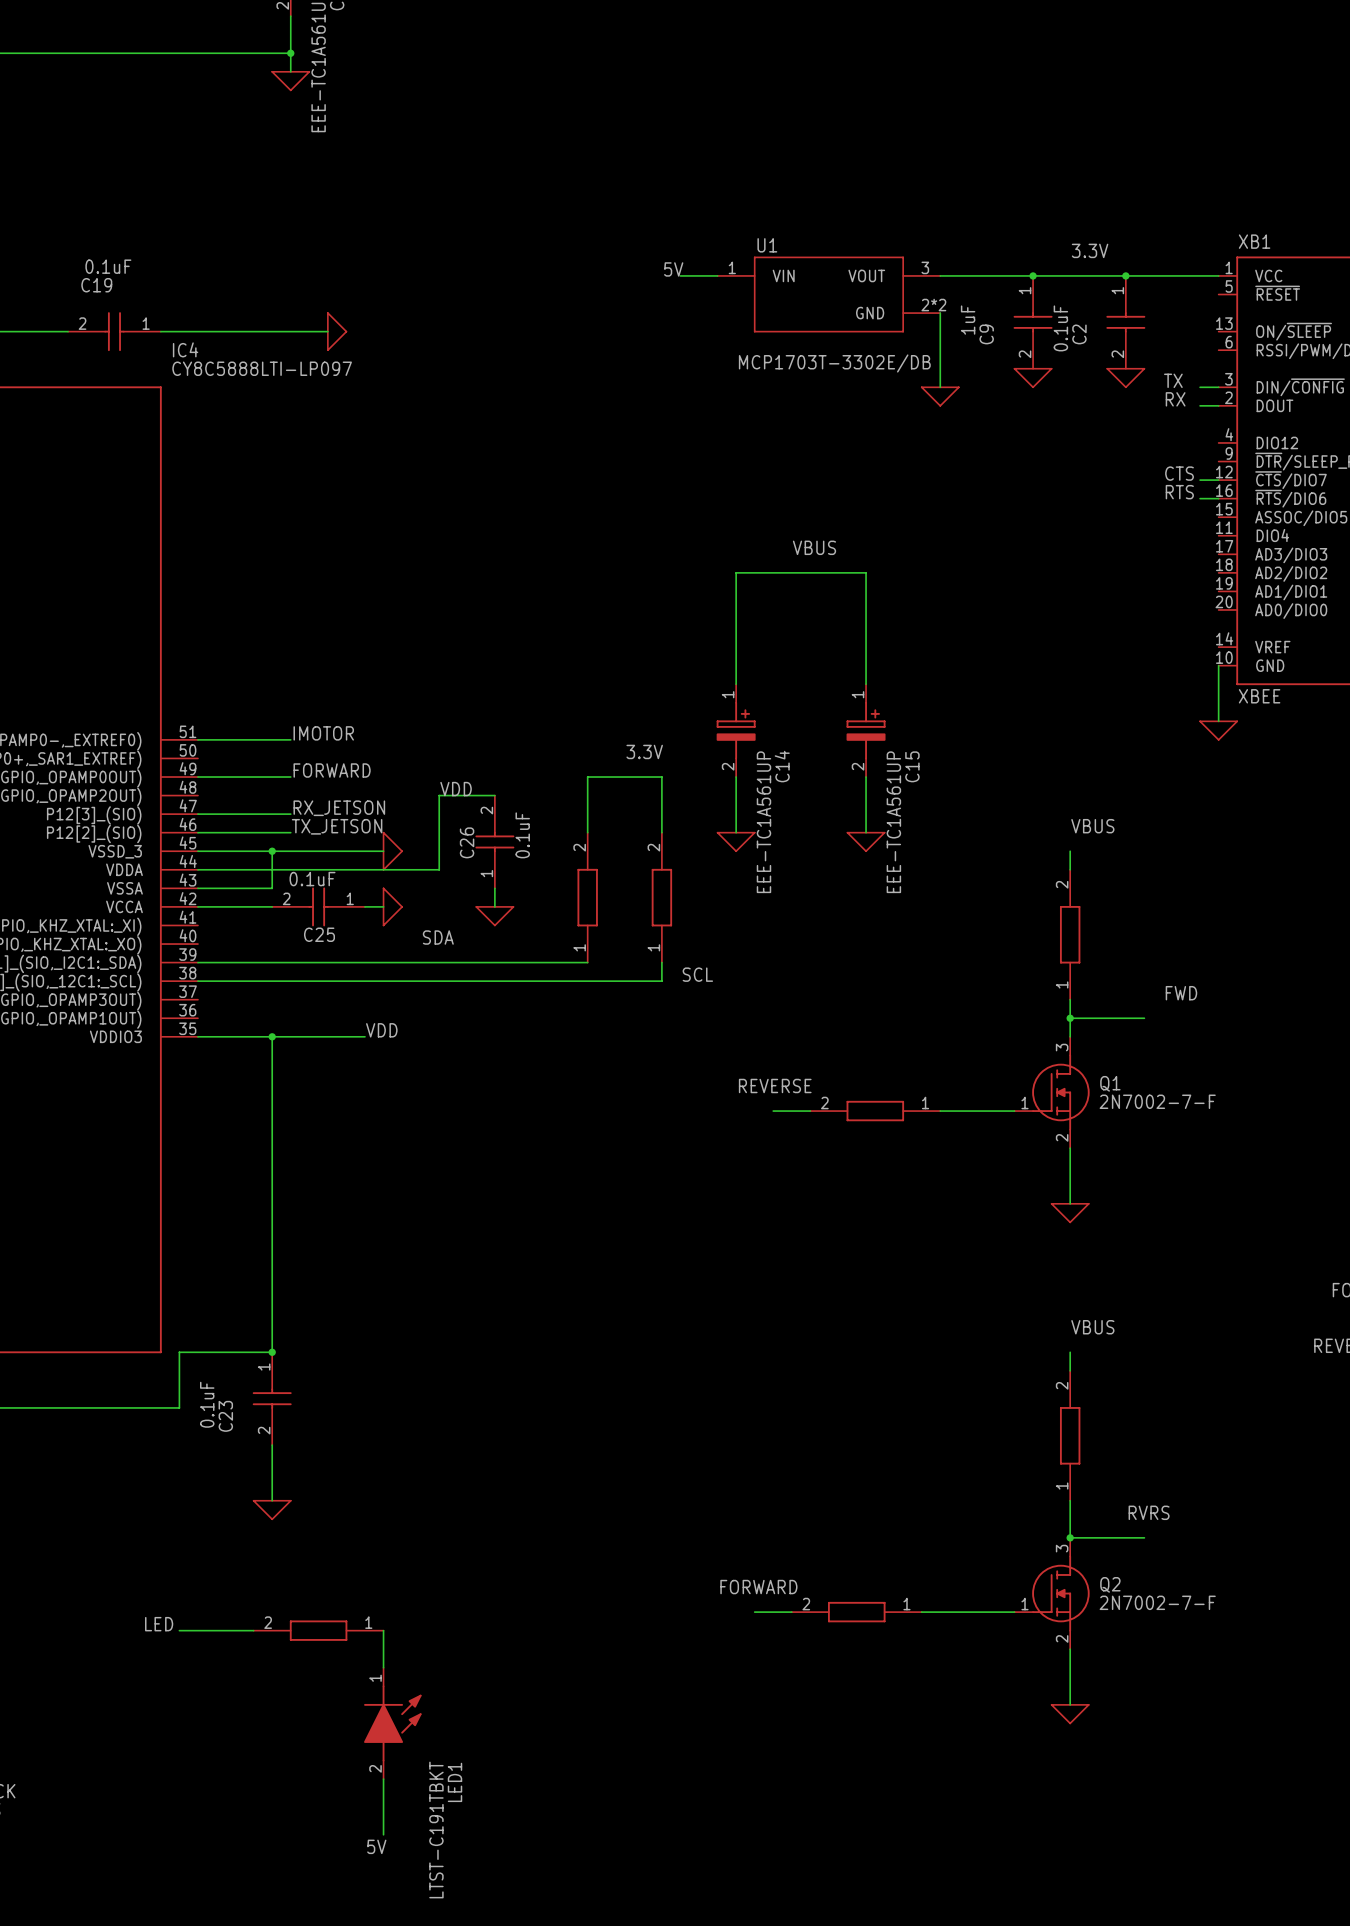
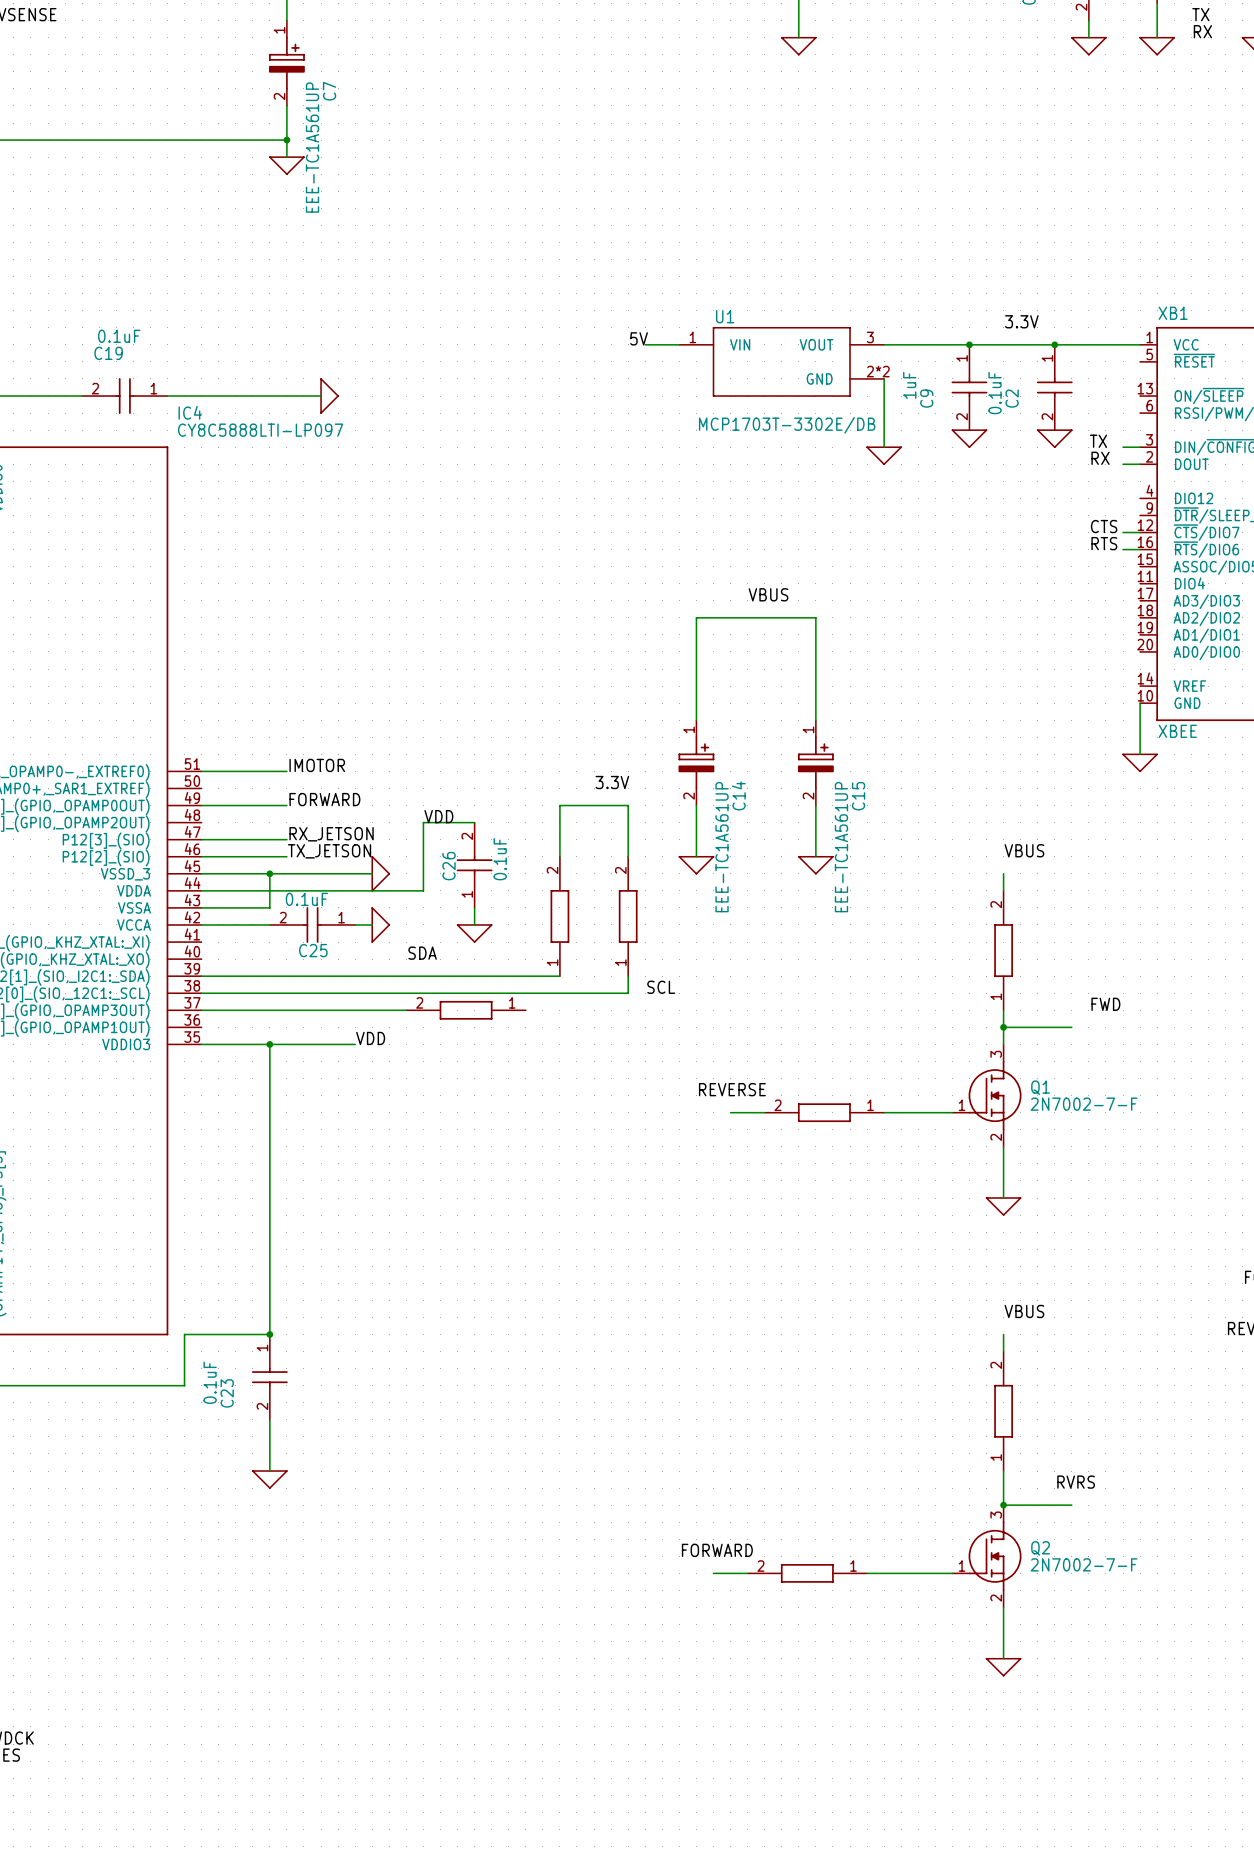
wire: none -> (201, 1010) (406, 1010)
part: none -> (466, 1010)
label: LED (159, 1624) -> none
wire: (179, 1630) (253, 1630) -> none
part: (318, 1630) -> none
wire: (383, 1630) (383, 1667) -> none
LED1: LTST-C191TBKT (392, 1723) -> none
wire: (383, 1779) (383, 1834) -> none
label: 5V (376, 1846) -> none

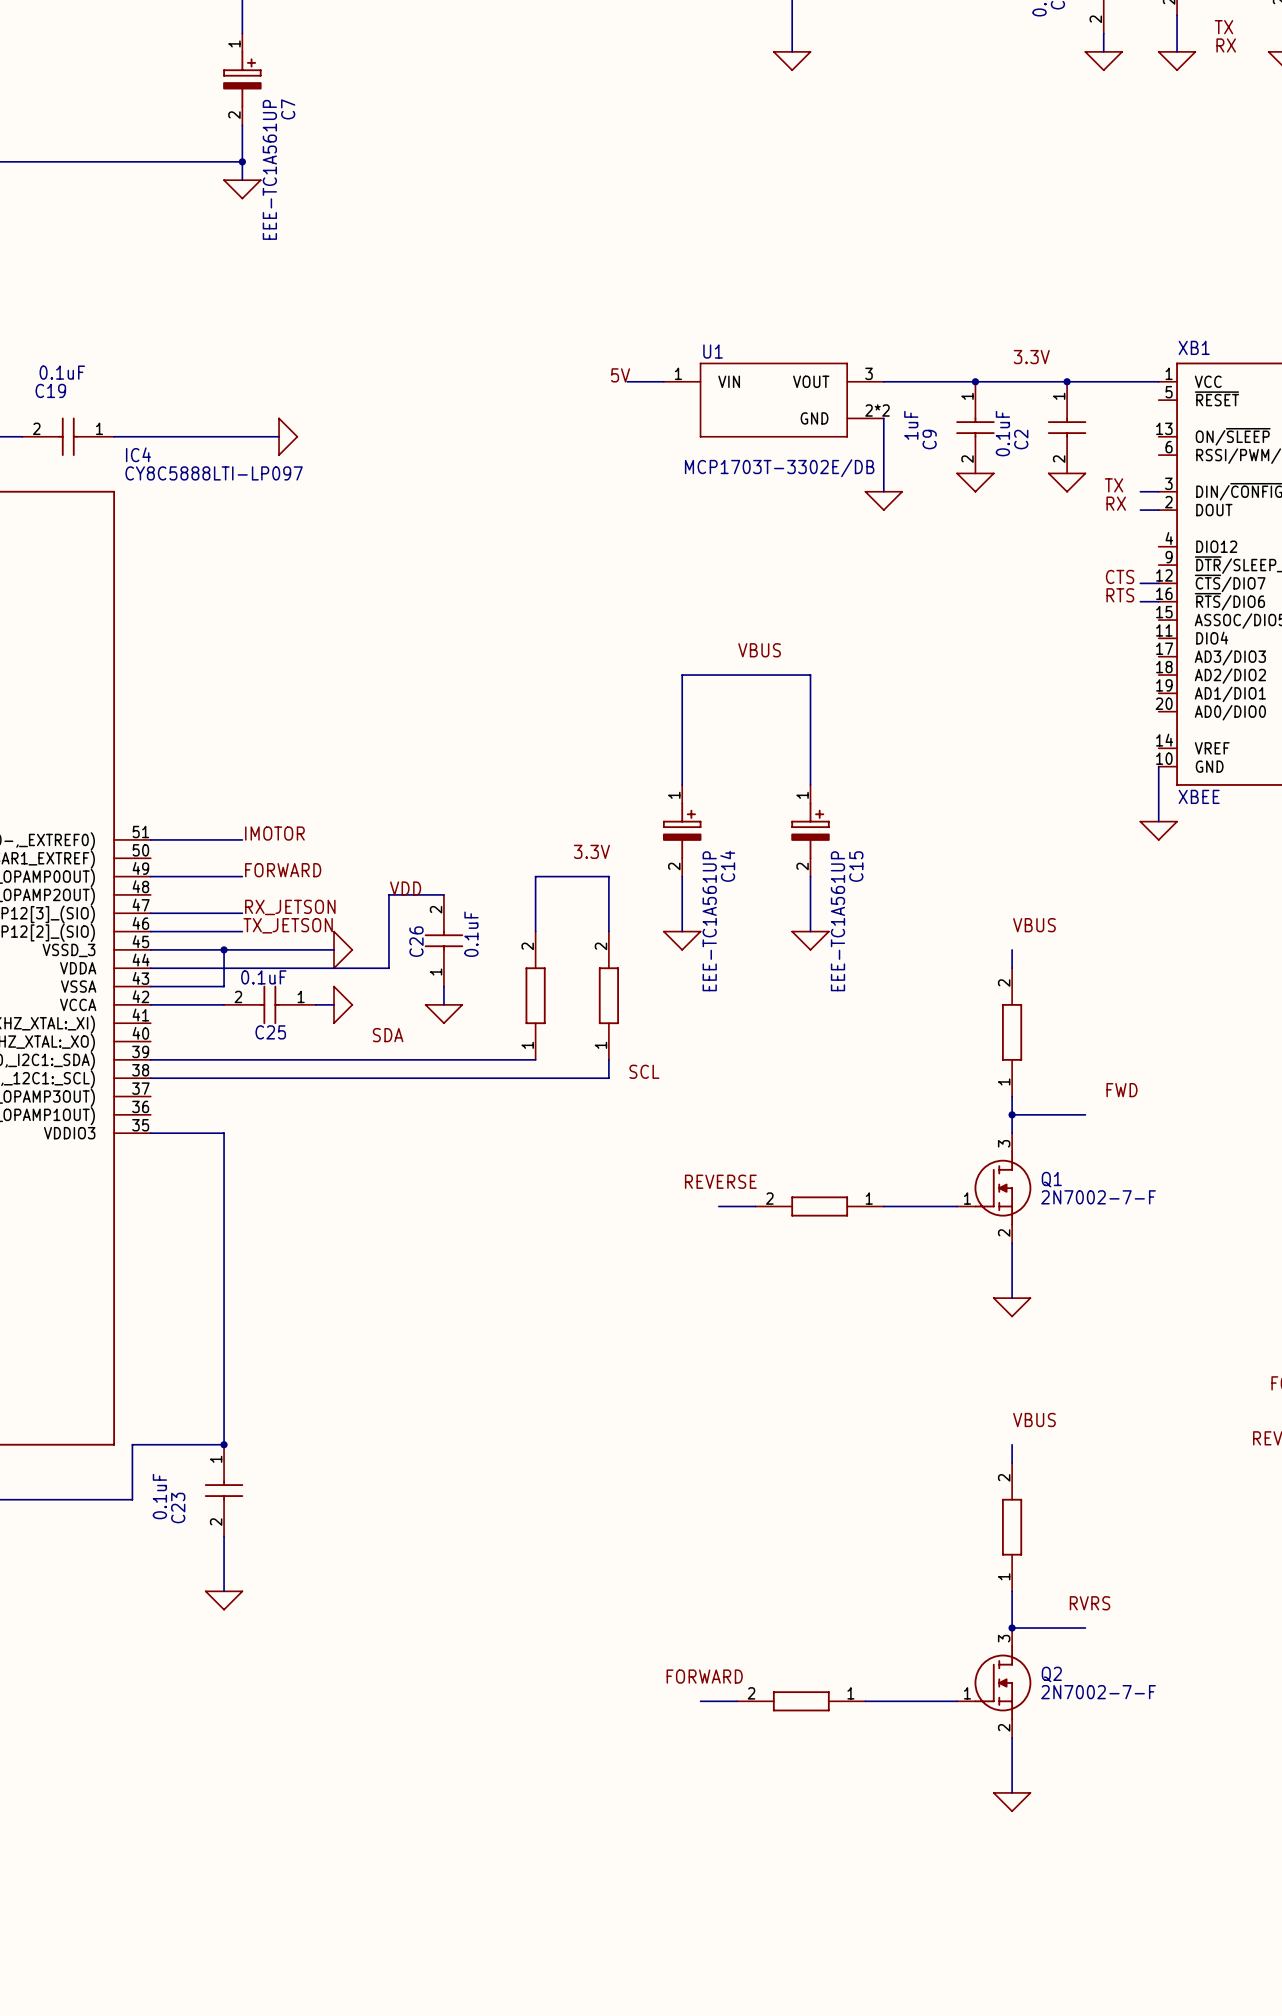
wire: (201, 1010) (406, 1010) -> none
part: (466, 1010) -> none
label: VDD (370, 1038) -> none
wire: (269, 1044) (355, 1044) -> none
junction: (269, 1044) -> none

